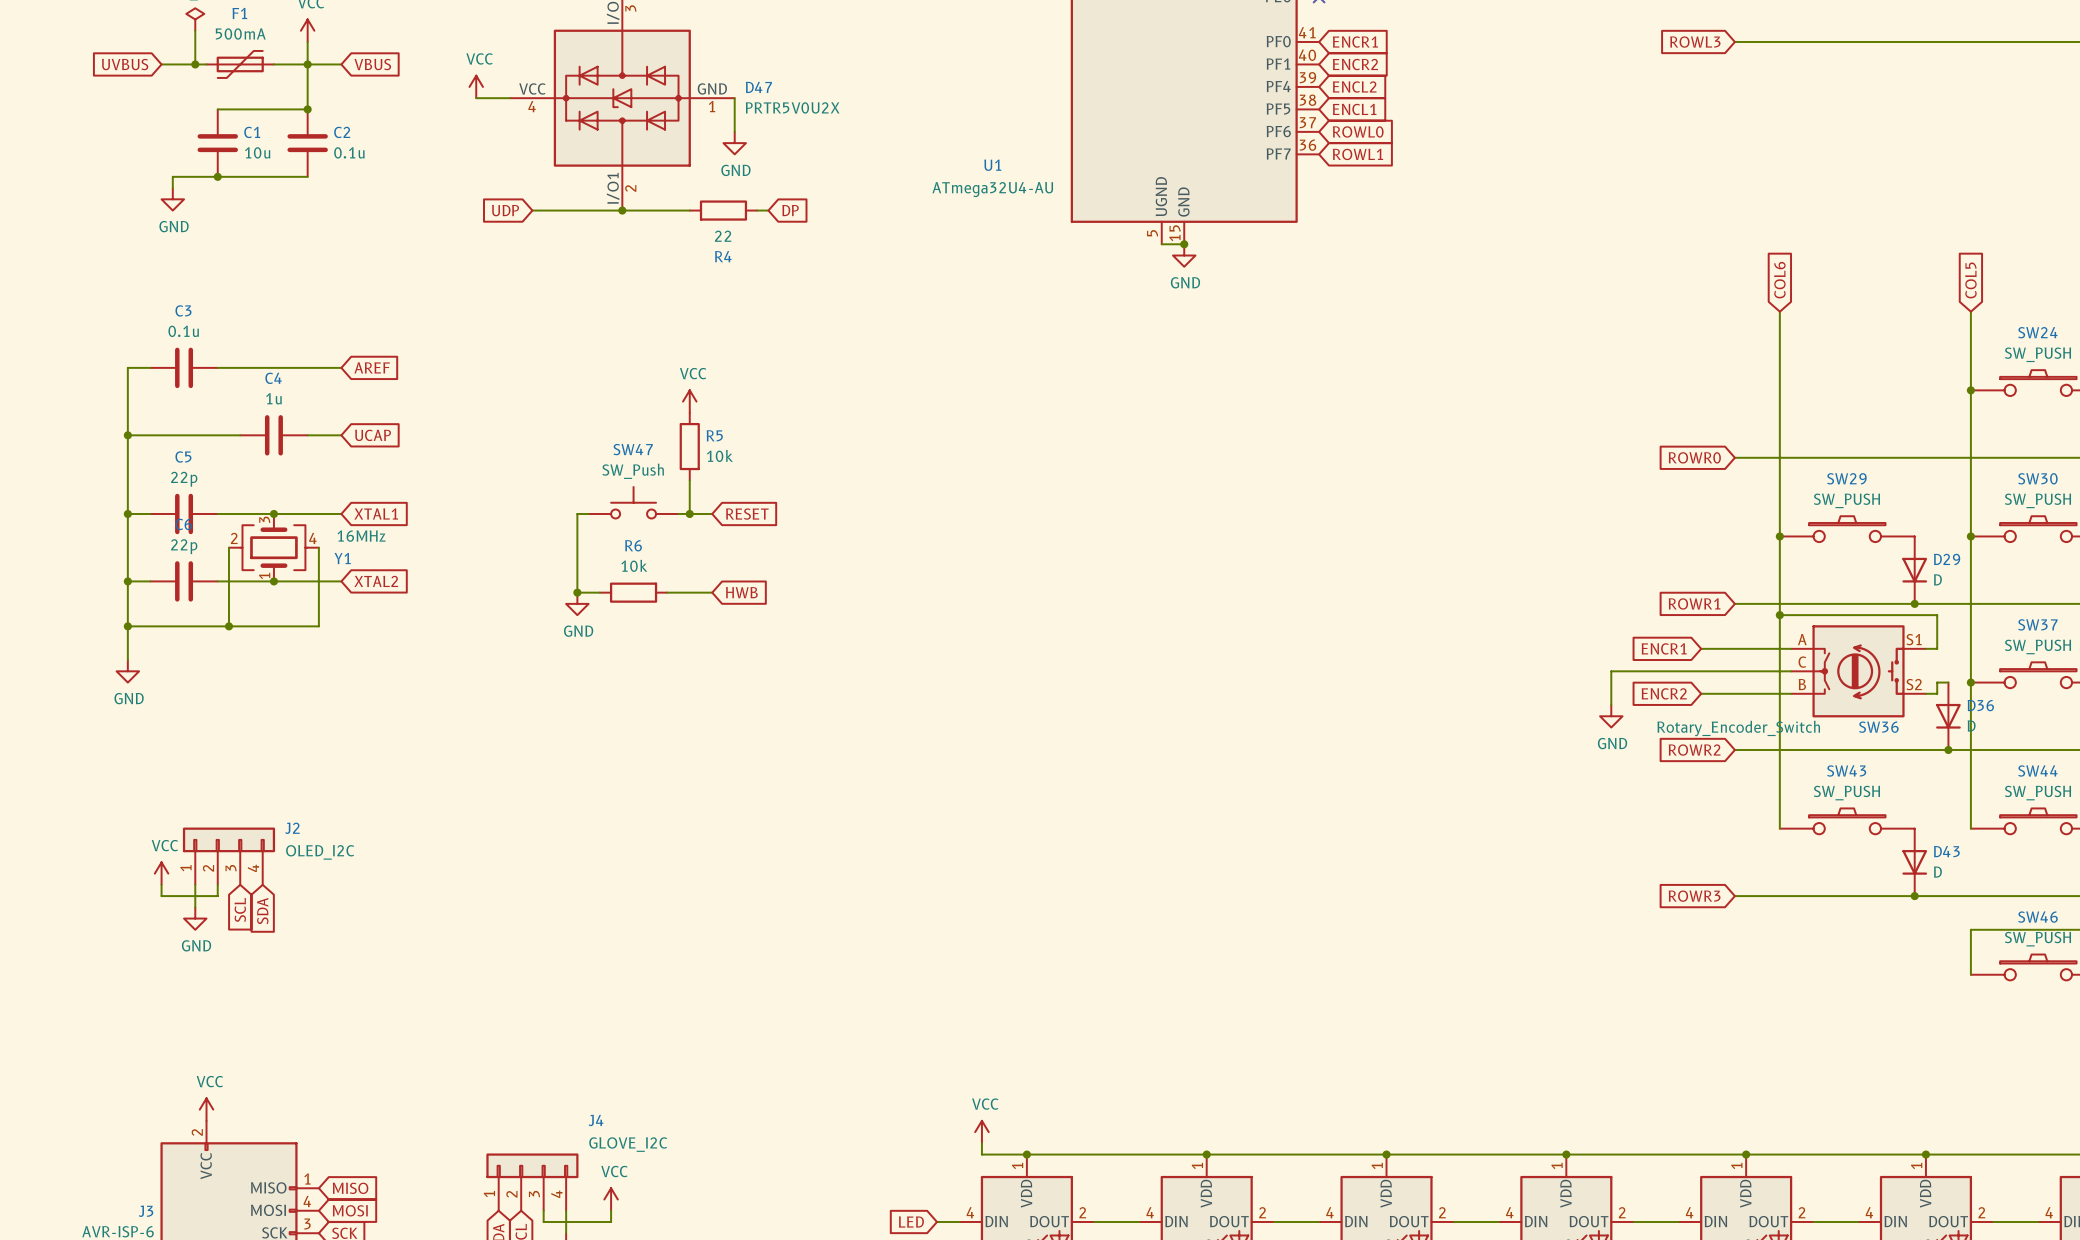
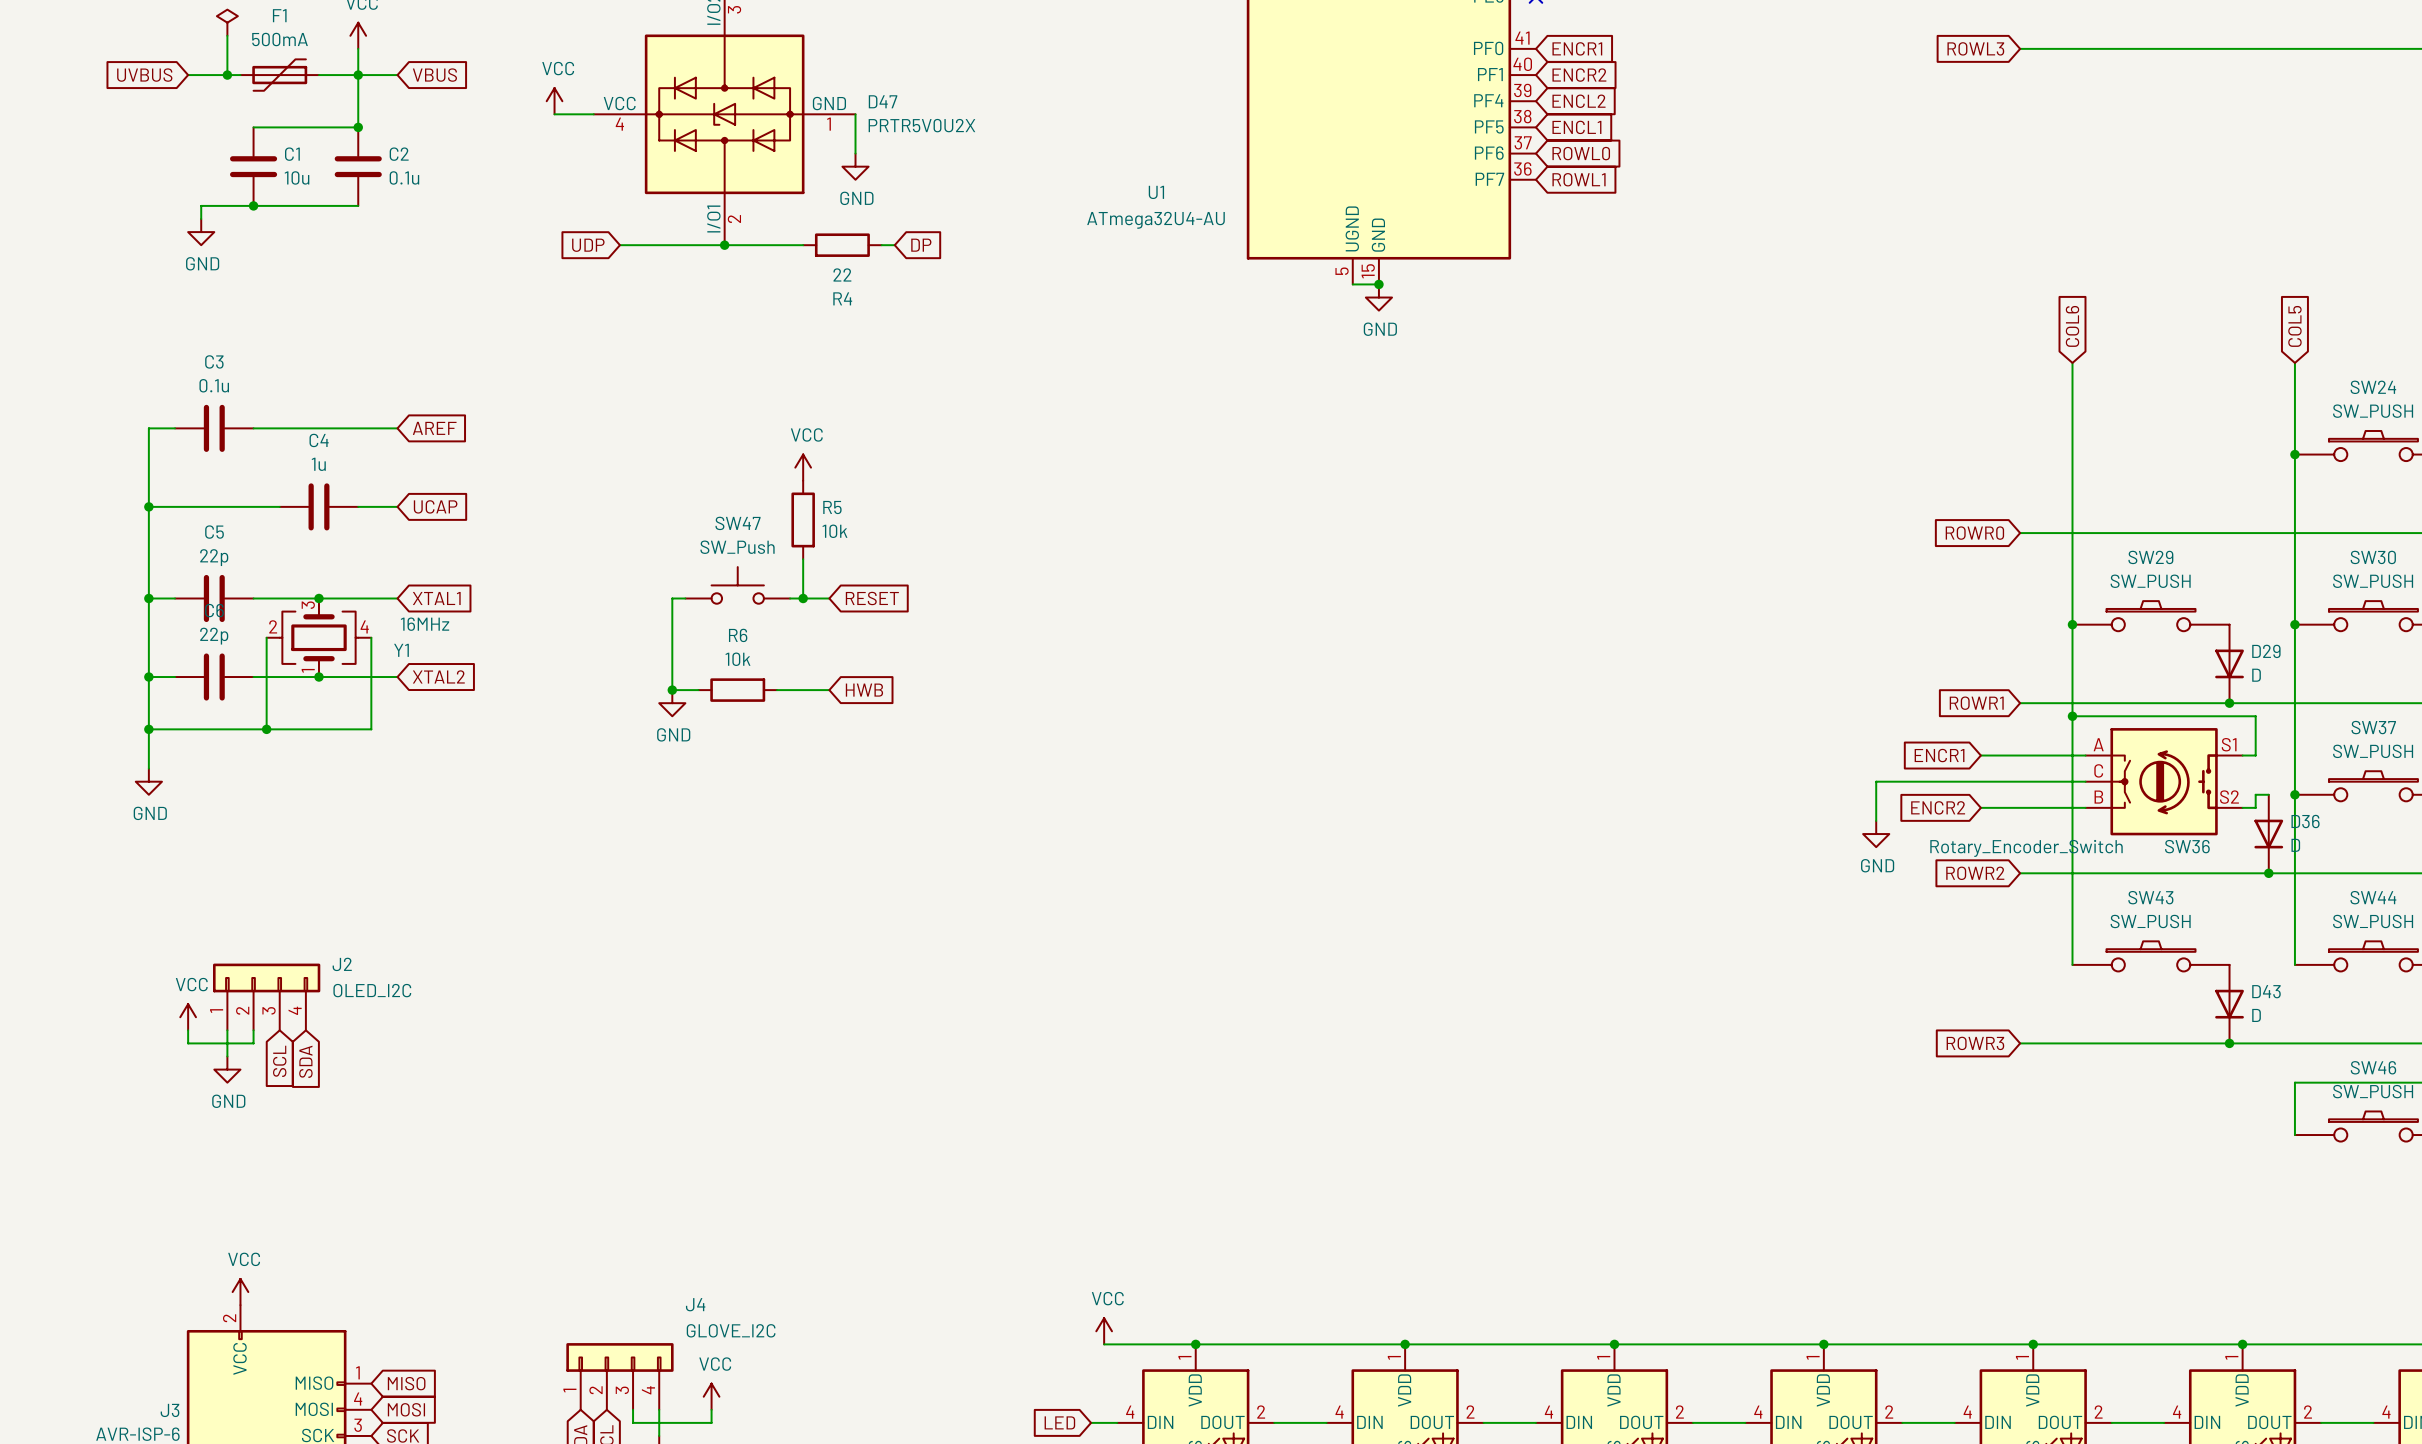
power symbol position: VCC (981, 1132) -> VCC (1104, 1331)
wire: (981, 1143) (981, 1154) -> (1104, 1344) (1143, 1344)

